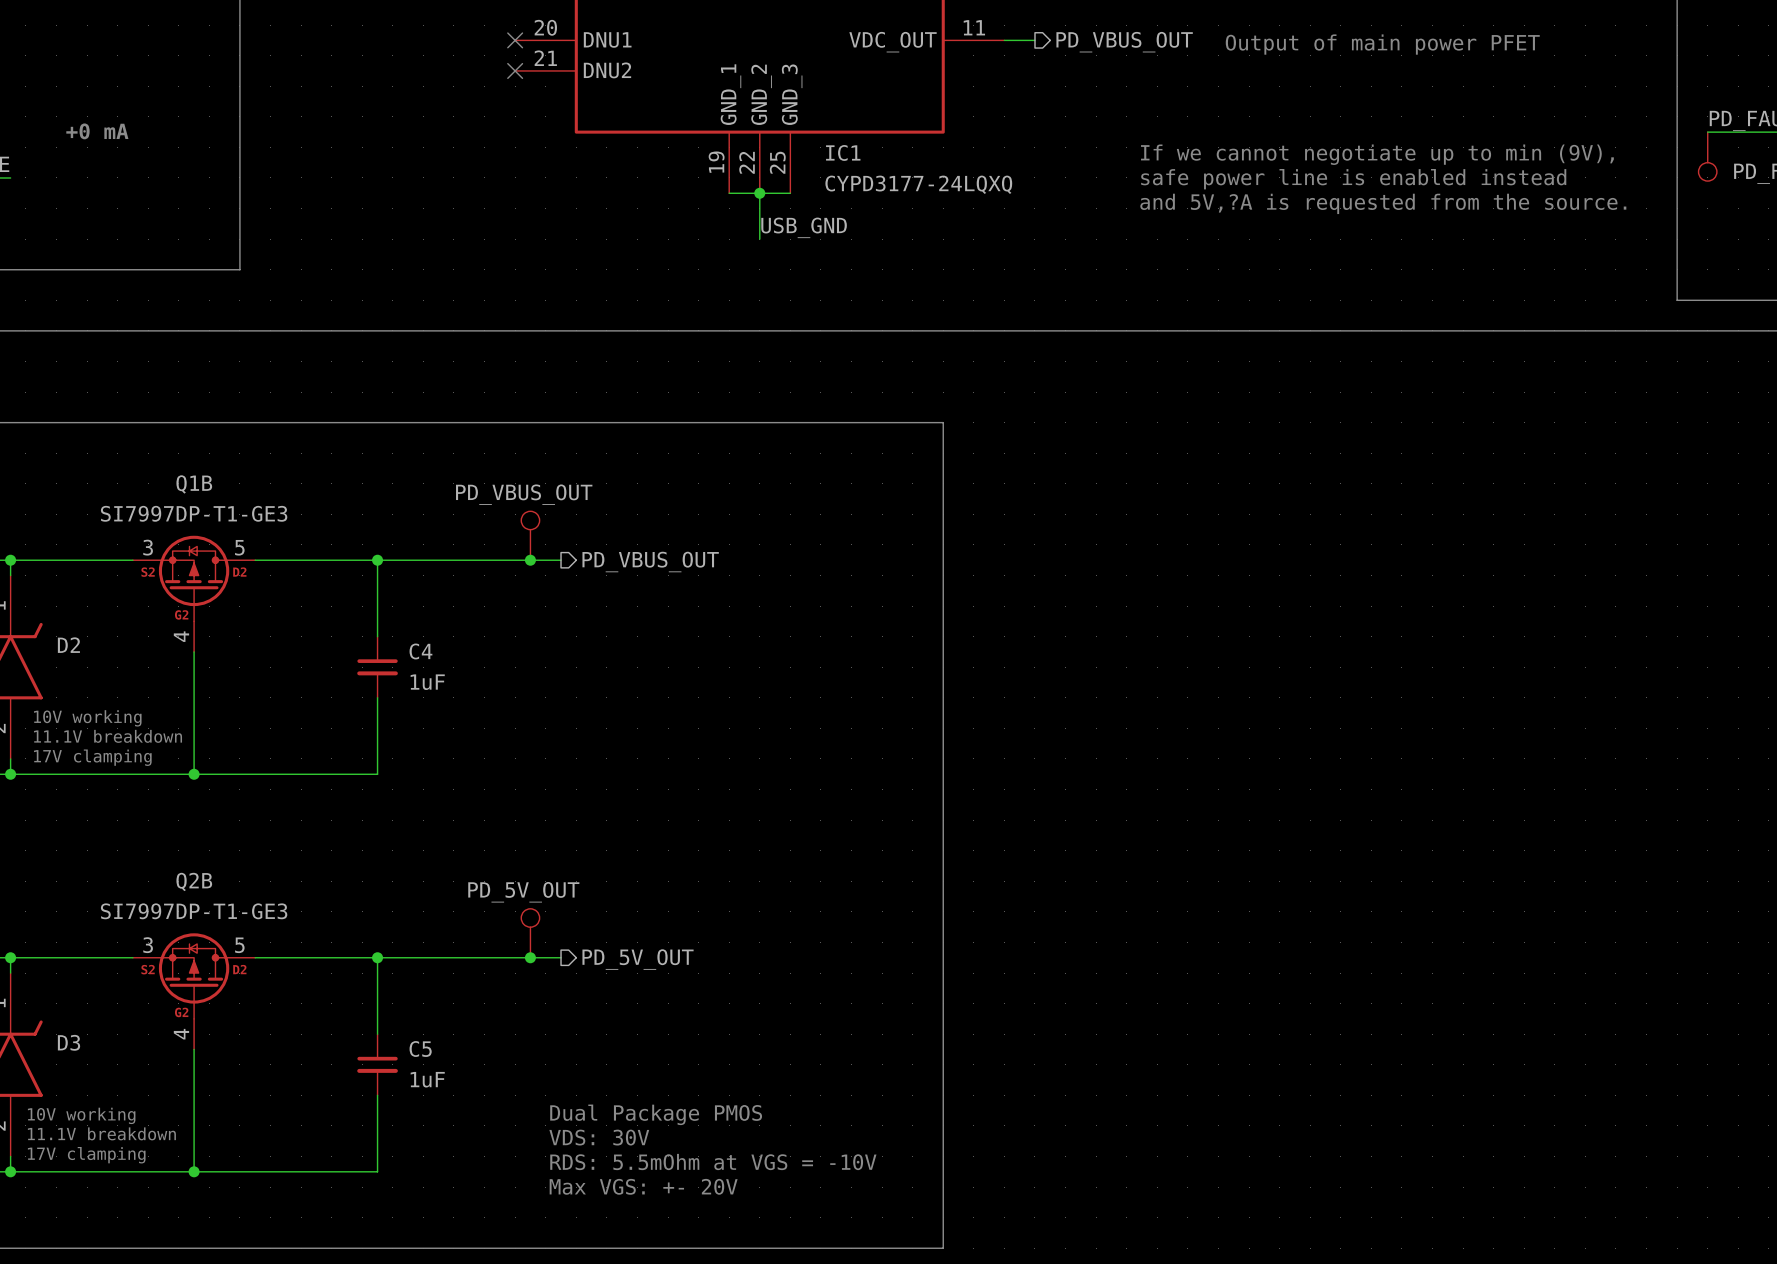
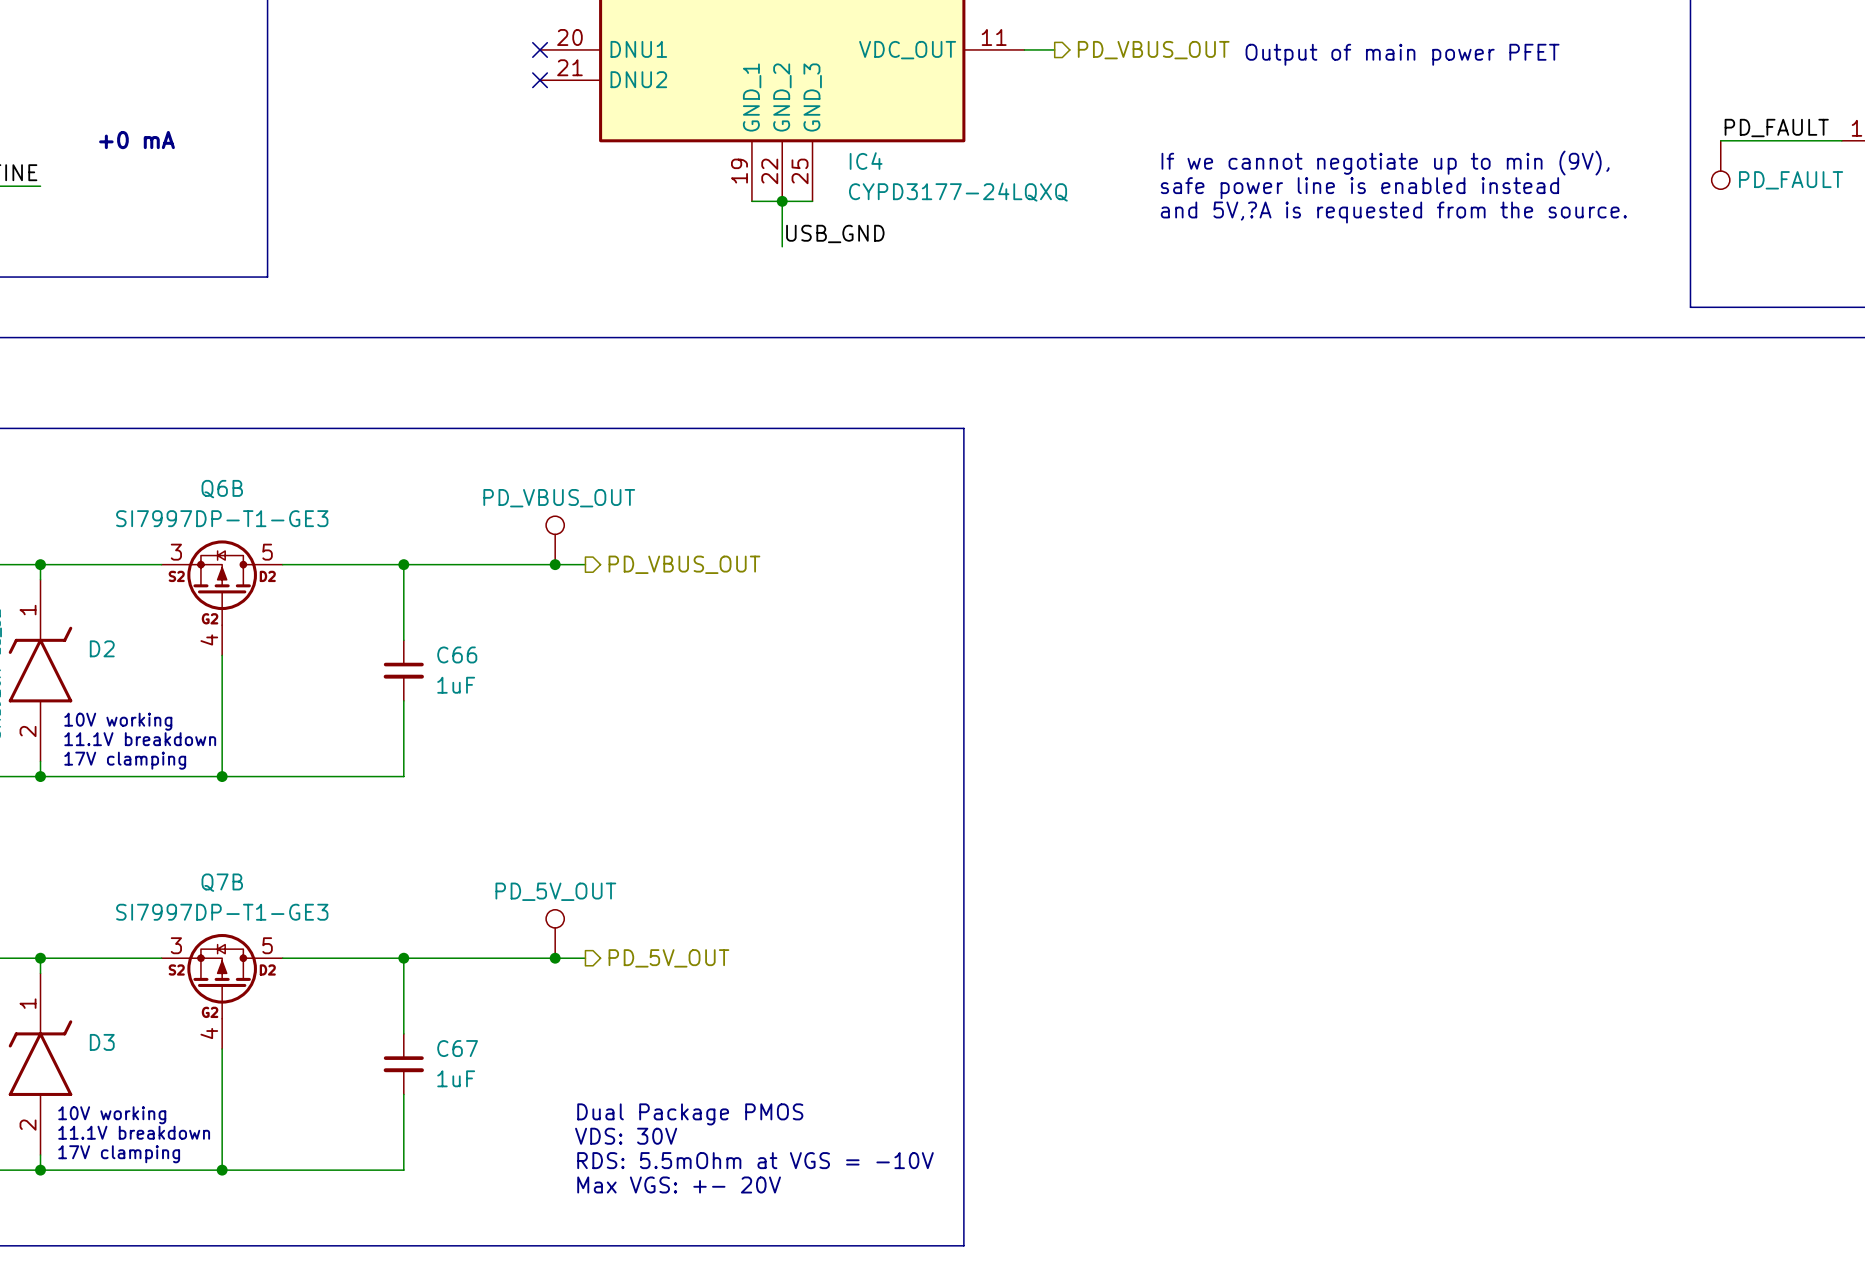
IC1 name: IC1 (843, 152) -> IC4 (866, 161)
Q1B name: Q1B (194, 484) -> Q6B (222, 489)
C4 name: C4 (420, 651) -> C66 (457, 654)
Q2B name: Q2B (194, 881) -> Q7B (222, 882)
C5 name: C5 (420, 1049) -> C67 (457, 1048)

